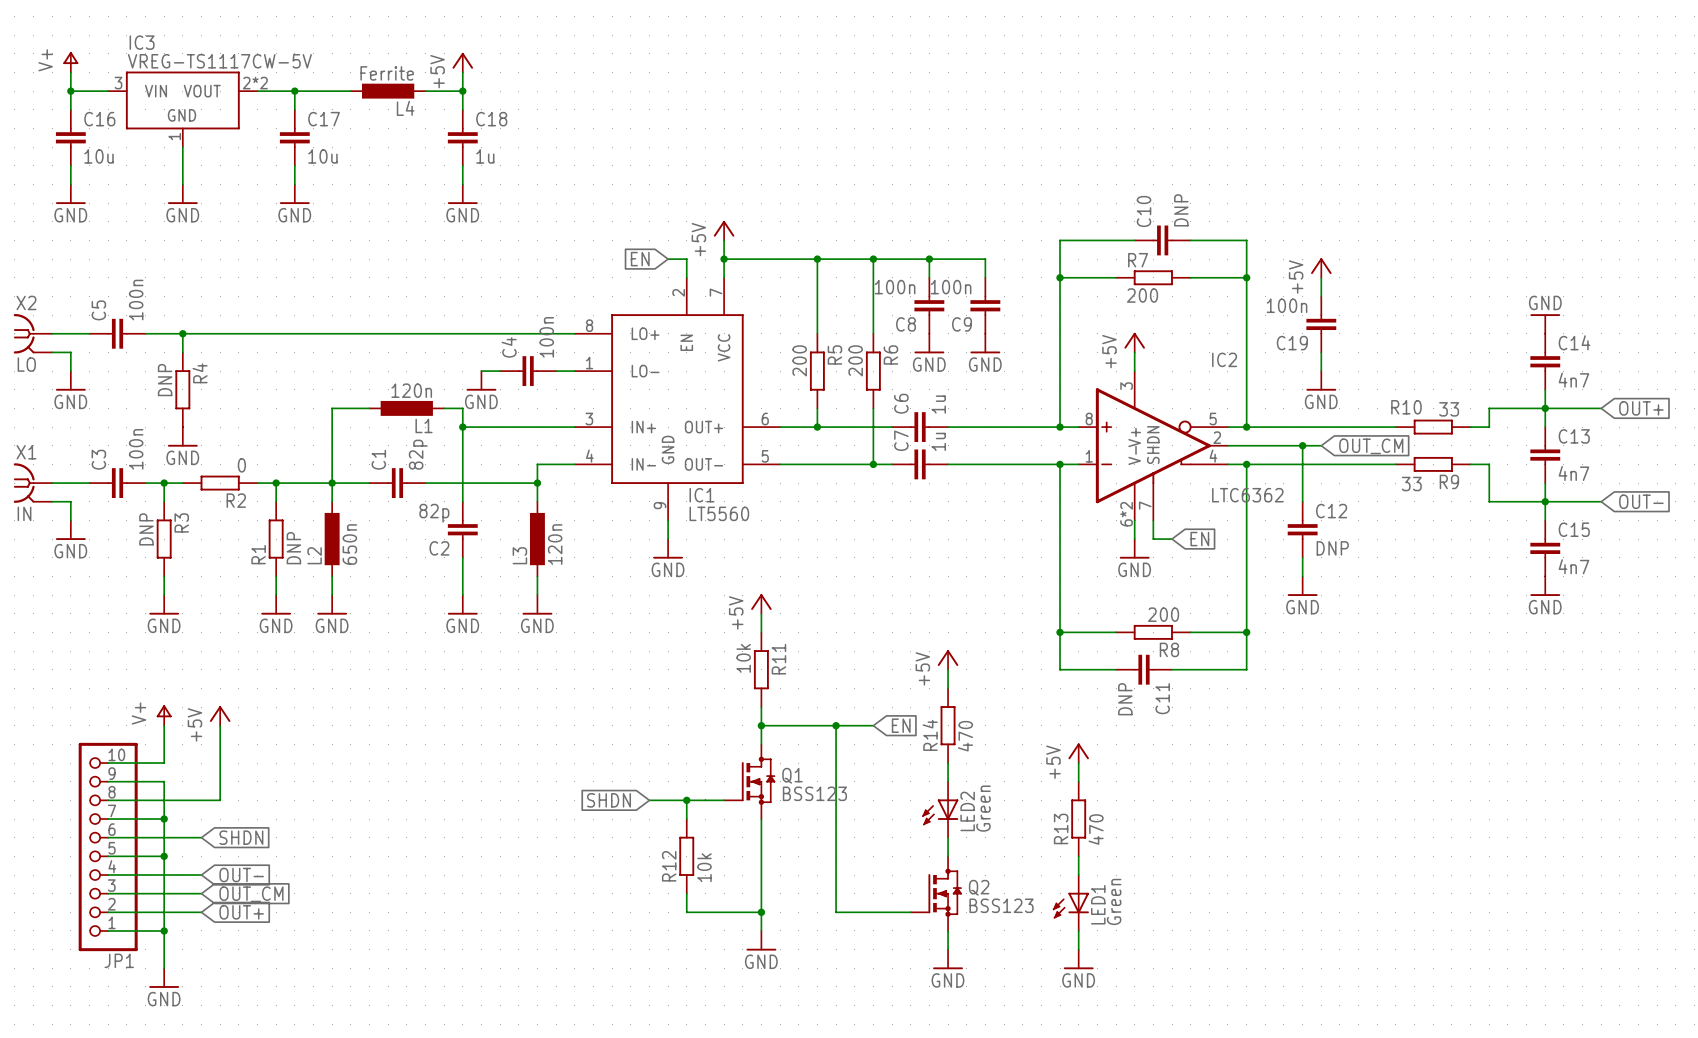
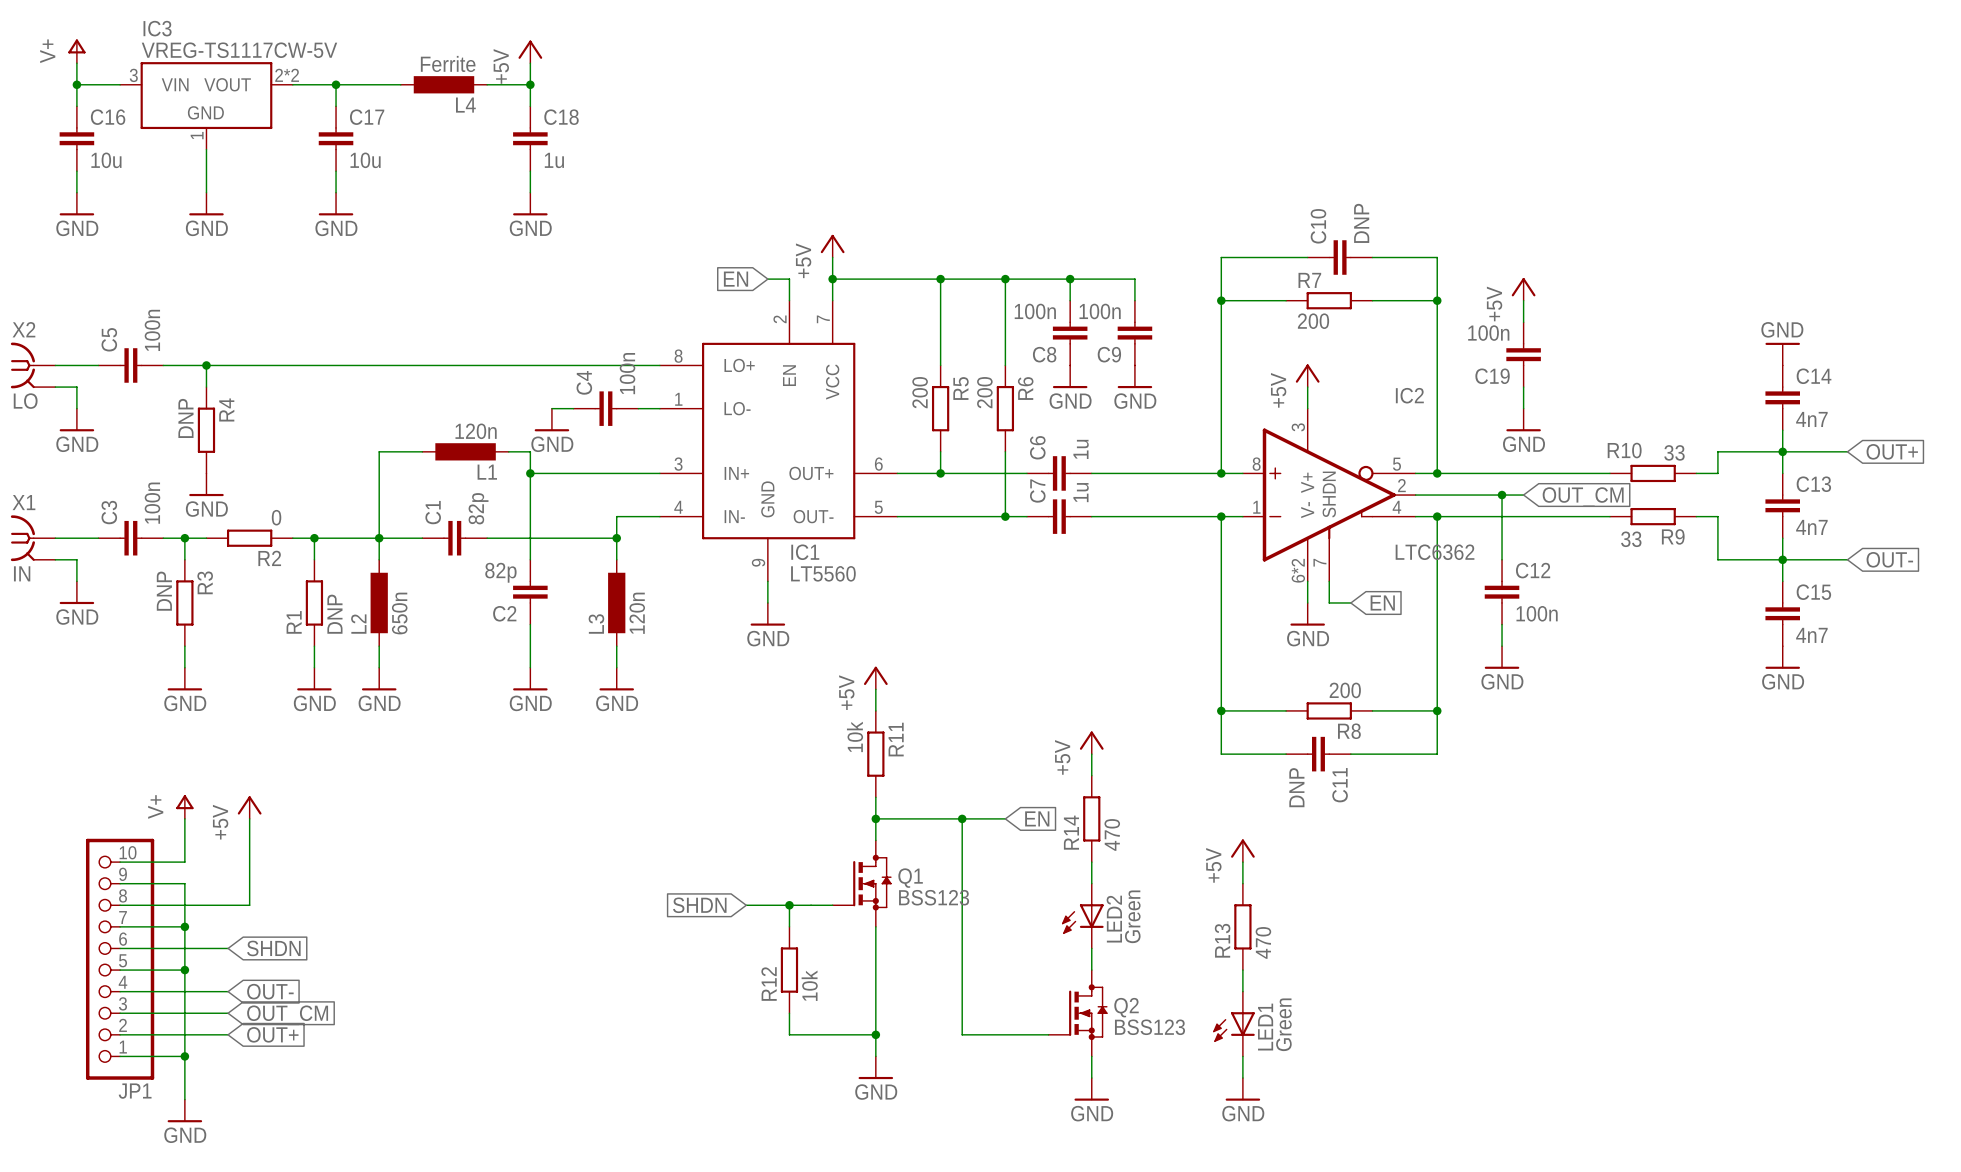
C12 value: DNP (1332, 548) -> 100n (1537, 613)

